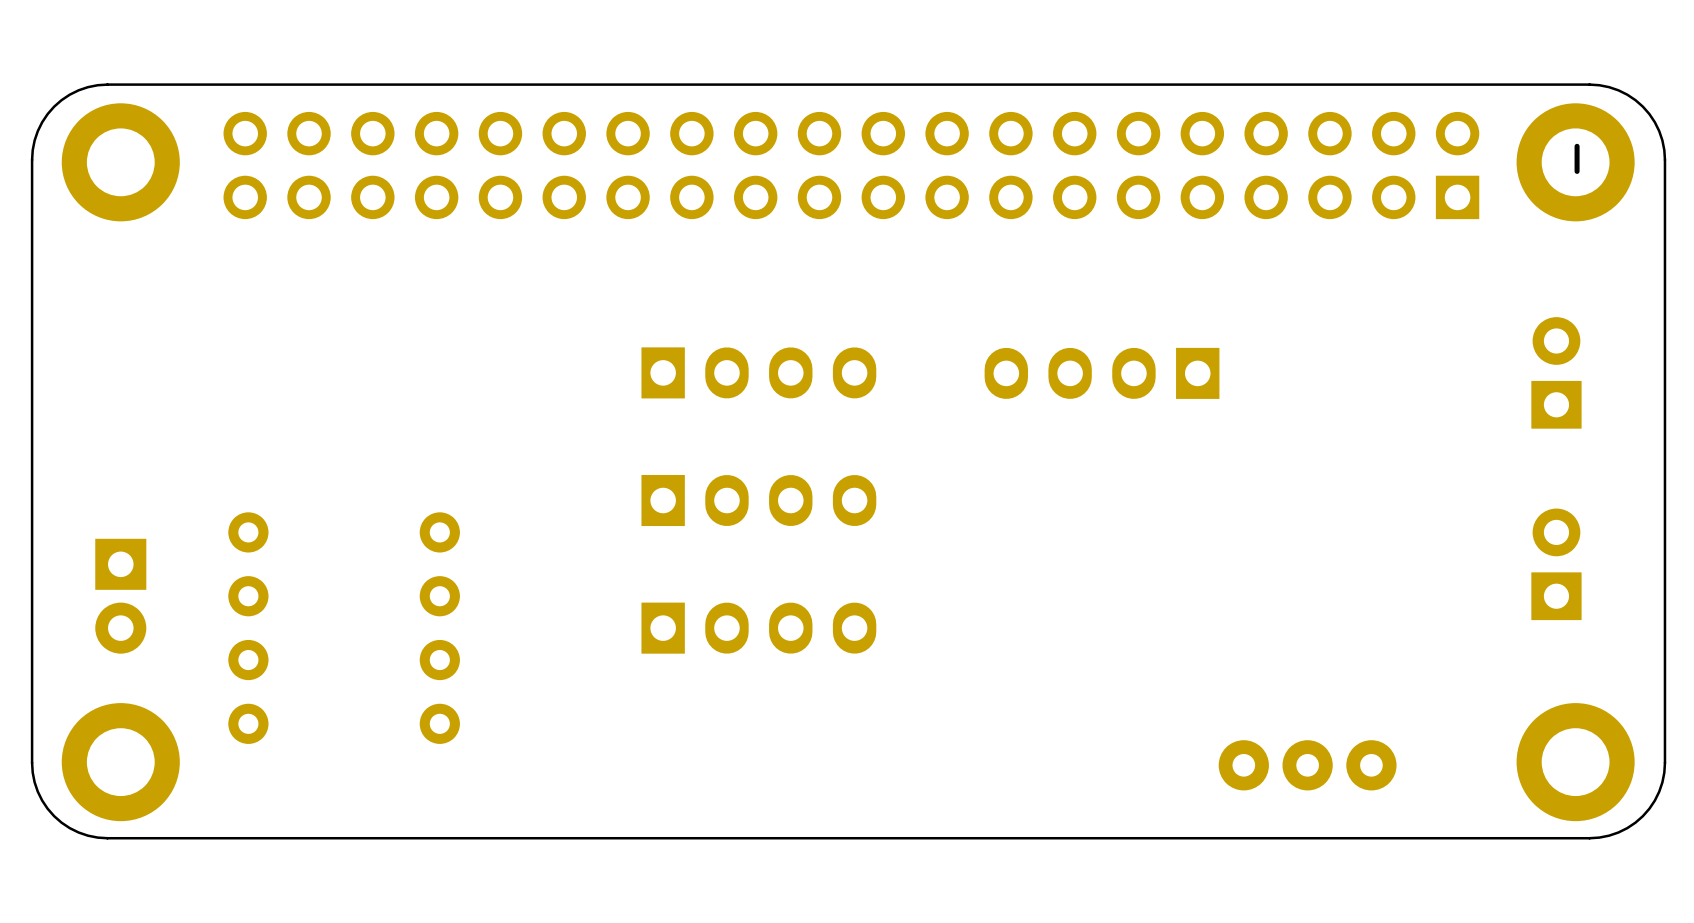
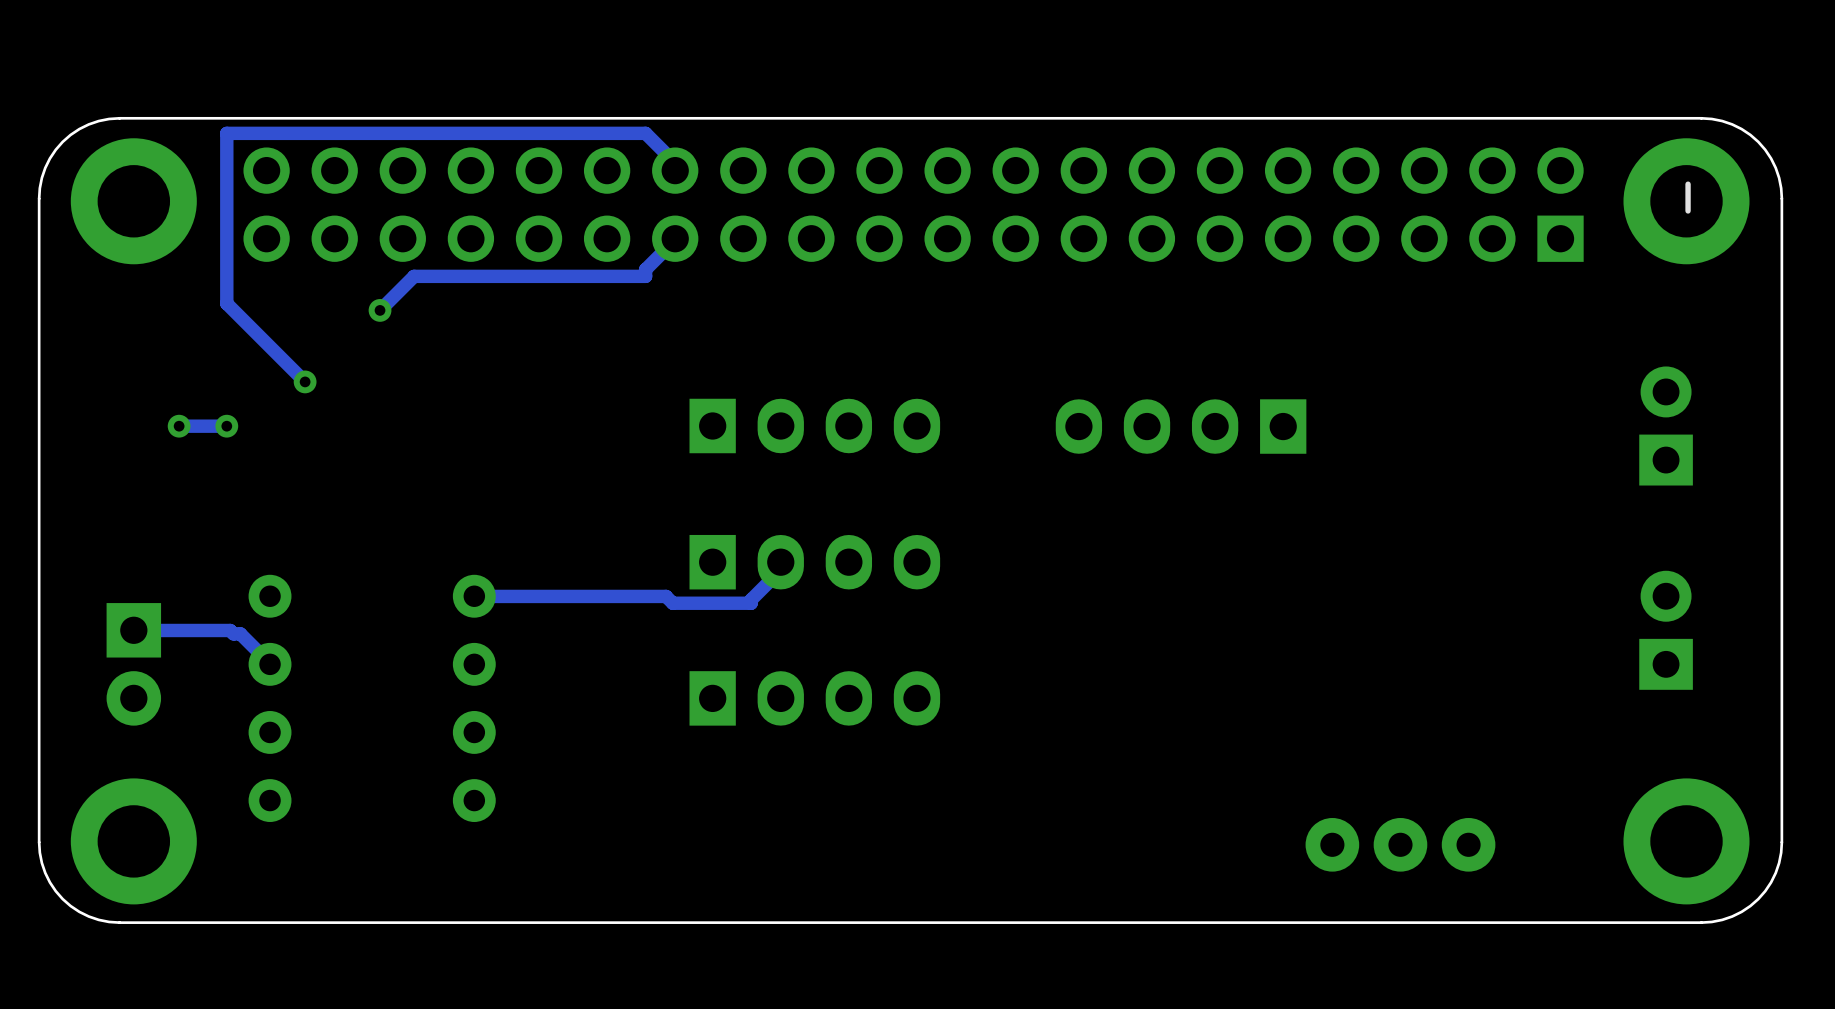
track: none -> (675, 170) (676, 164) (645, 133) (226, 133) (226, 303) (305, 381)
track: none -> (675, 238) (645, 269) (645, 276) (414, 276) (380, 310)
via: none -> (380, 310)
via: none -> (305, 381)
via: none -> (179, 426)
track: none -> (226, 426) (179, 426)
via: none -> (226, 426)
track: none -> (780, 562) (781, 569) (751, 599) (751, 603) (672, 603) (666, 596) (474, 596)
track: none -> (133, 630) (230, 630) (233, 633) (240, 633) (270, 664)

